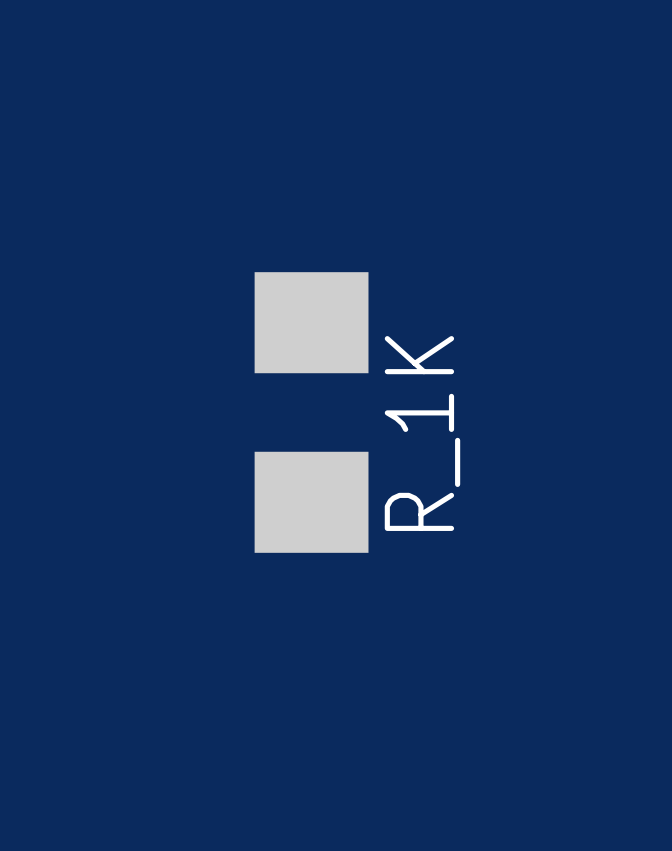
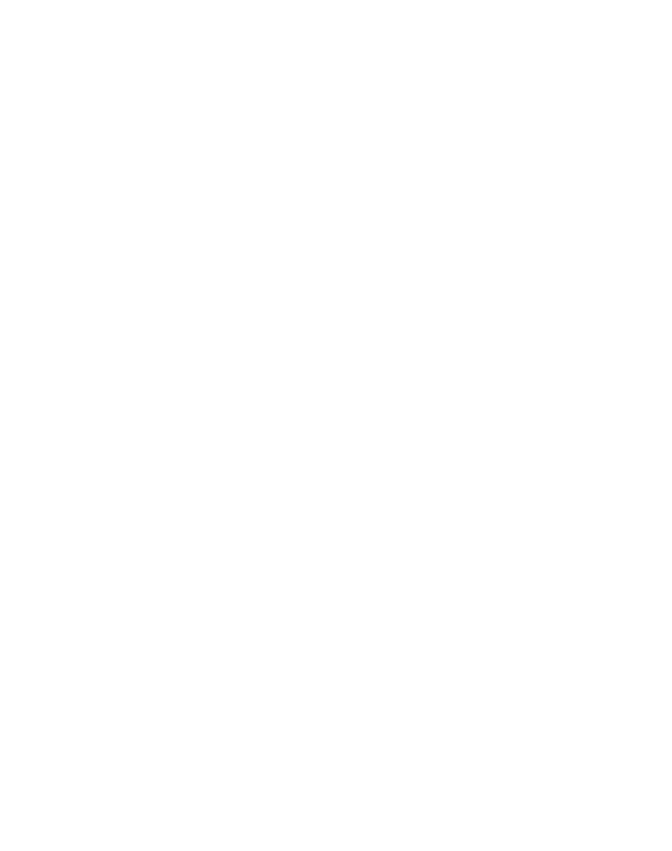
R_1K: (311, 412) -> none

